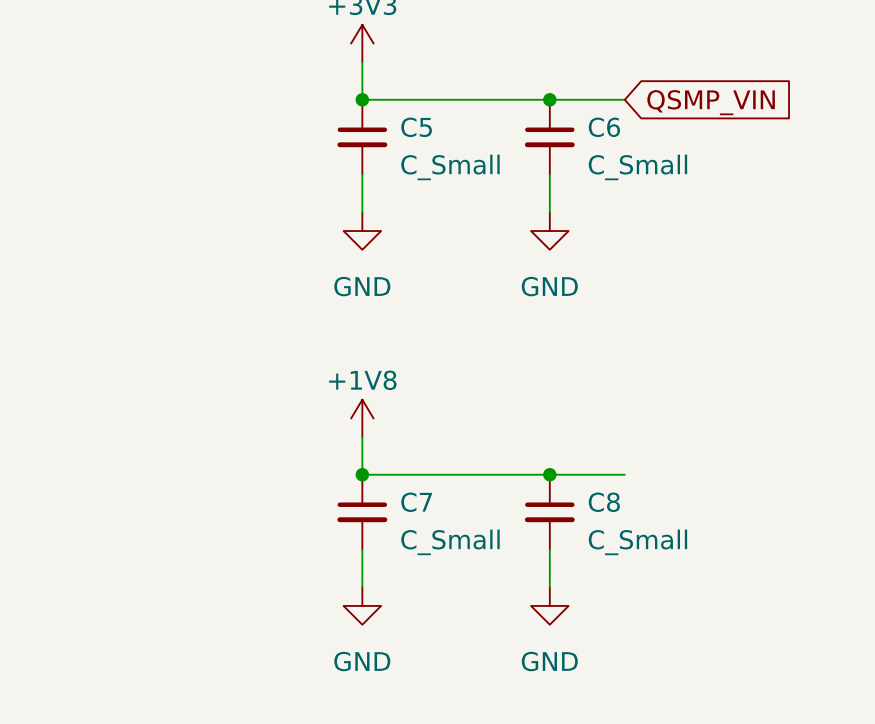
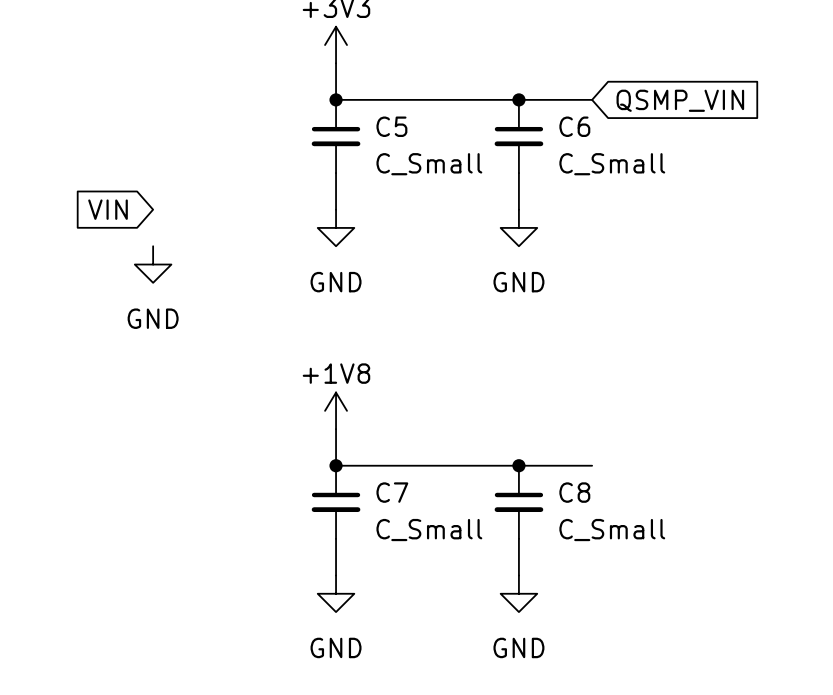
global label: none -> VIN (108, 209)
power symbol: none -> GND (153, 264)

